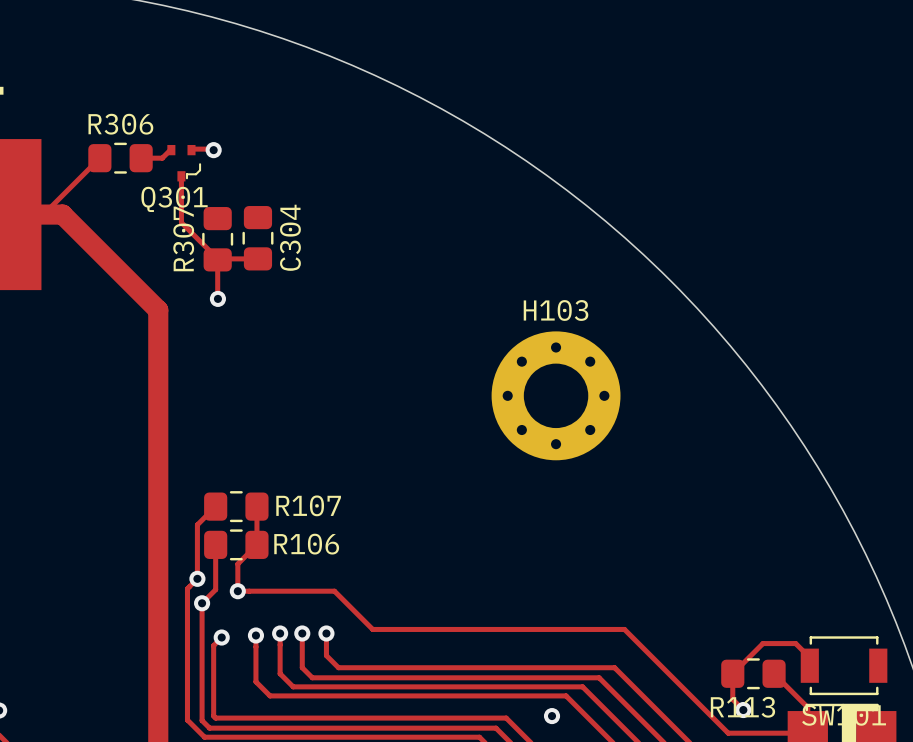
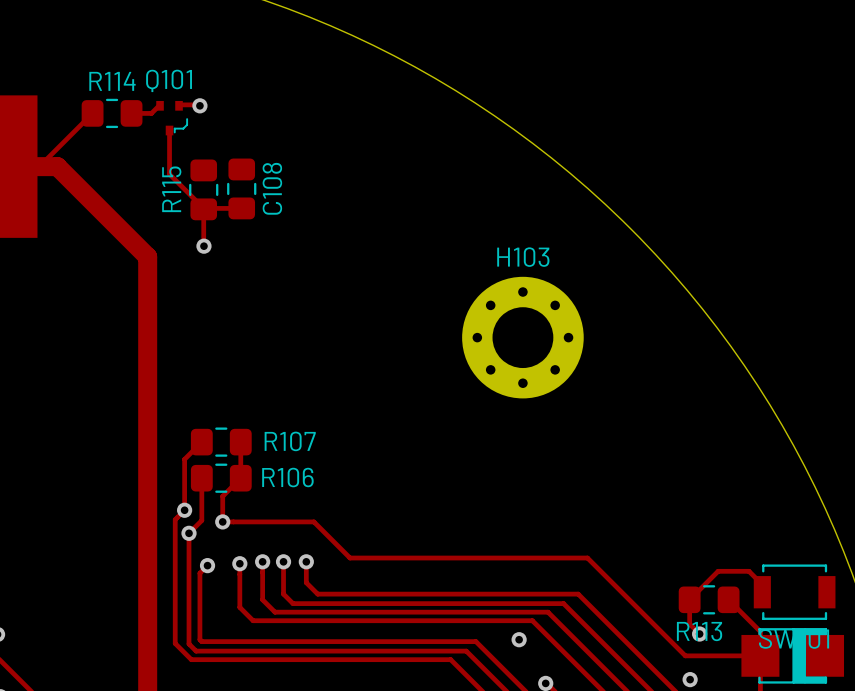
R306 name: R306 (120, 124) -> R114 (112, 81)
Q301 name: Q301 (174, 199) -> Q101 (169, 80)
C304 name: C304 (290, 237) -> C108 (272, 188)
R307 name: R307 (183, 238) -> R115 (171, 189)

